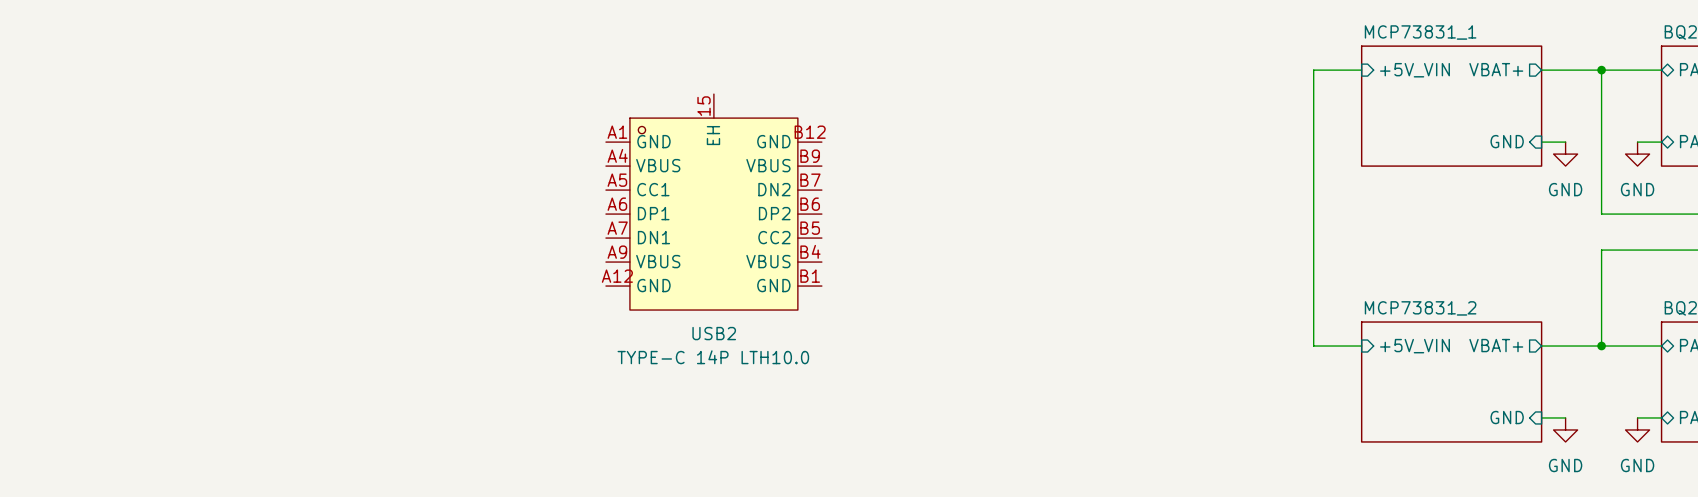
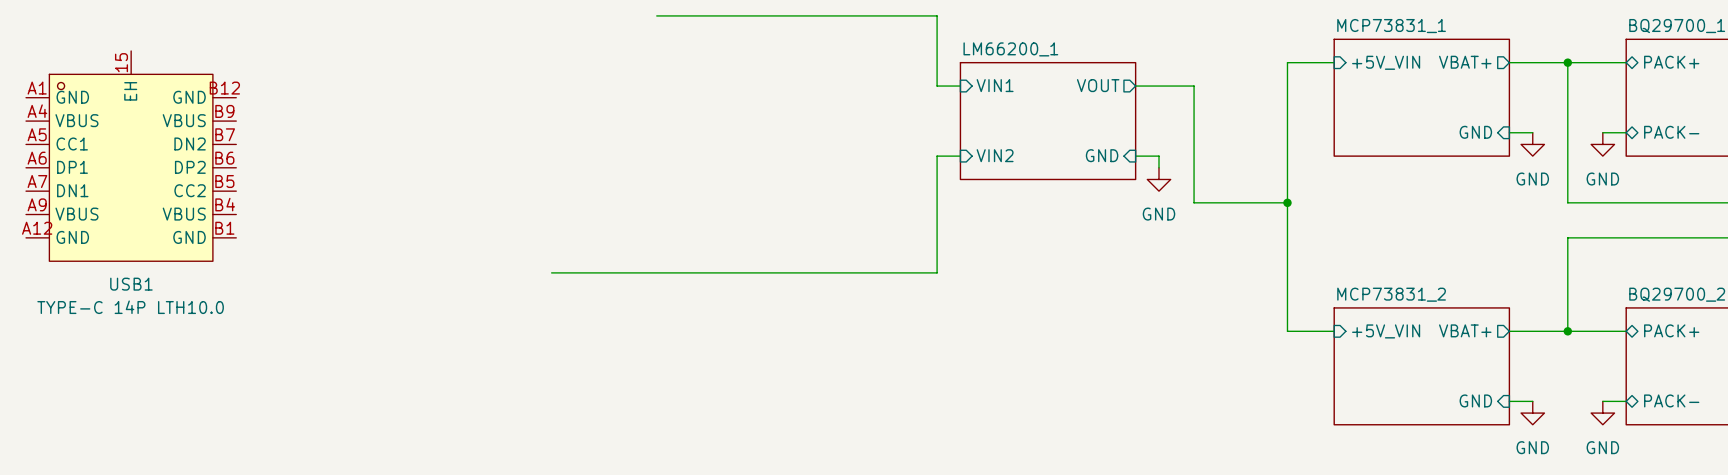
wire: none -> (656, 15) (937, 15) (937, 86) (960, 86)
sheet pin: none -> VIN1 (995, 85)
sheet pin: none -> VOUT (1098, 85)
wire: none -> (1135, 86) (1194, 86) (1194, 202) (1287, 202)
sheet LM66200_1: none -> (1048, 121)
sheet pin: none -> VIN2 (995, 155)
sheet pin: none -> GND (1102, 155)
USB1: none -> TYPE-C 14P LTH10.0 (131, 156)
wire: none -> (960, 156) (937, 156) (937, 272) (551, 272)
wire: none -> (1135, 156) (1158, 156) (1158, 167)
power symbol: none -> GND (1158, 179)
USB2: TYPE-C 14P LTH10.0 (713, 202) -> none
junction: none -> (1287, 202)

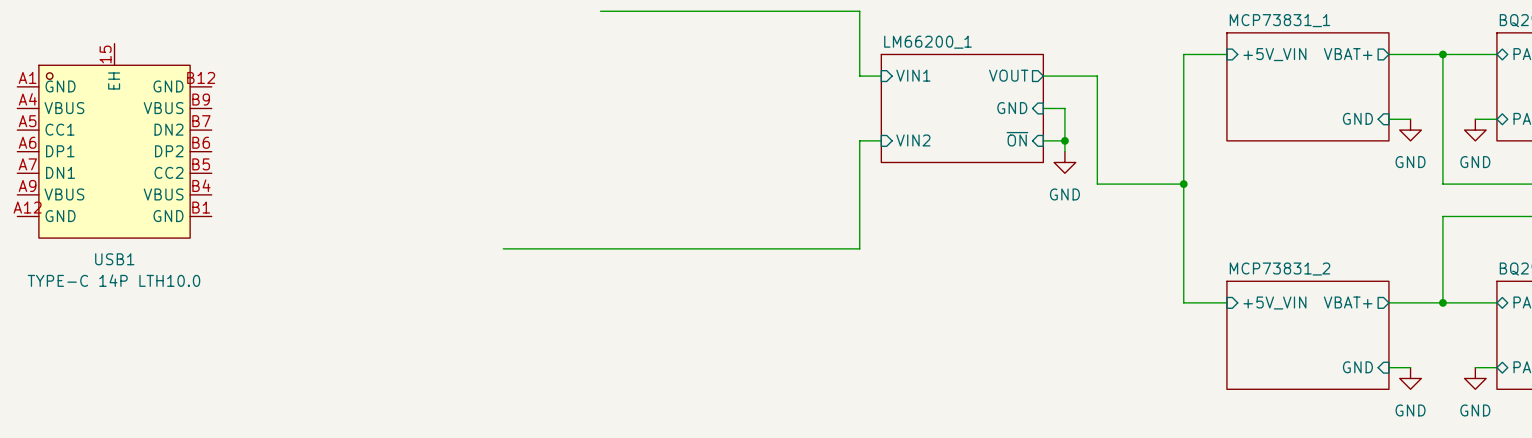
sheet pin: none -> GND (1012, 108)
wire: none -> (1043, 108) (1064, 108) (1064, 140)
sheet pin: GND (1102, 155) -> ~{ON} (1017, 139)
junction: none -> (1064, 140)

